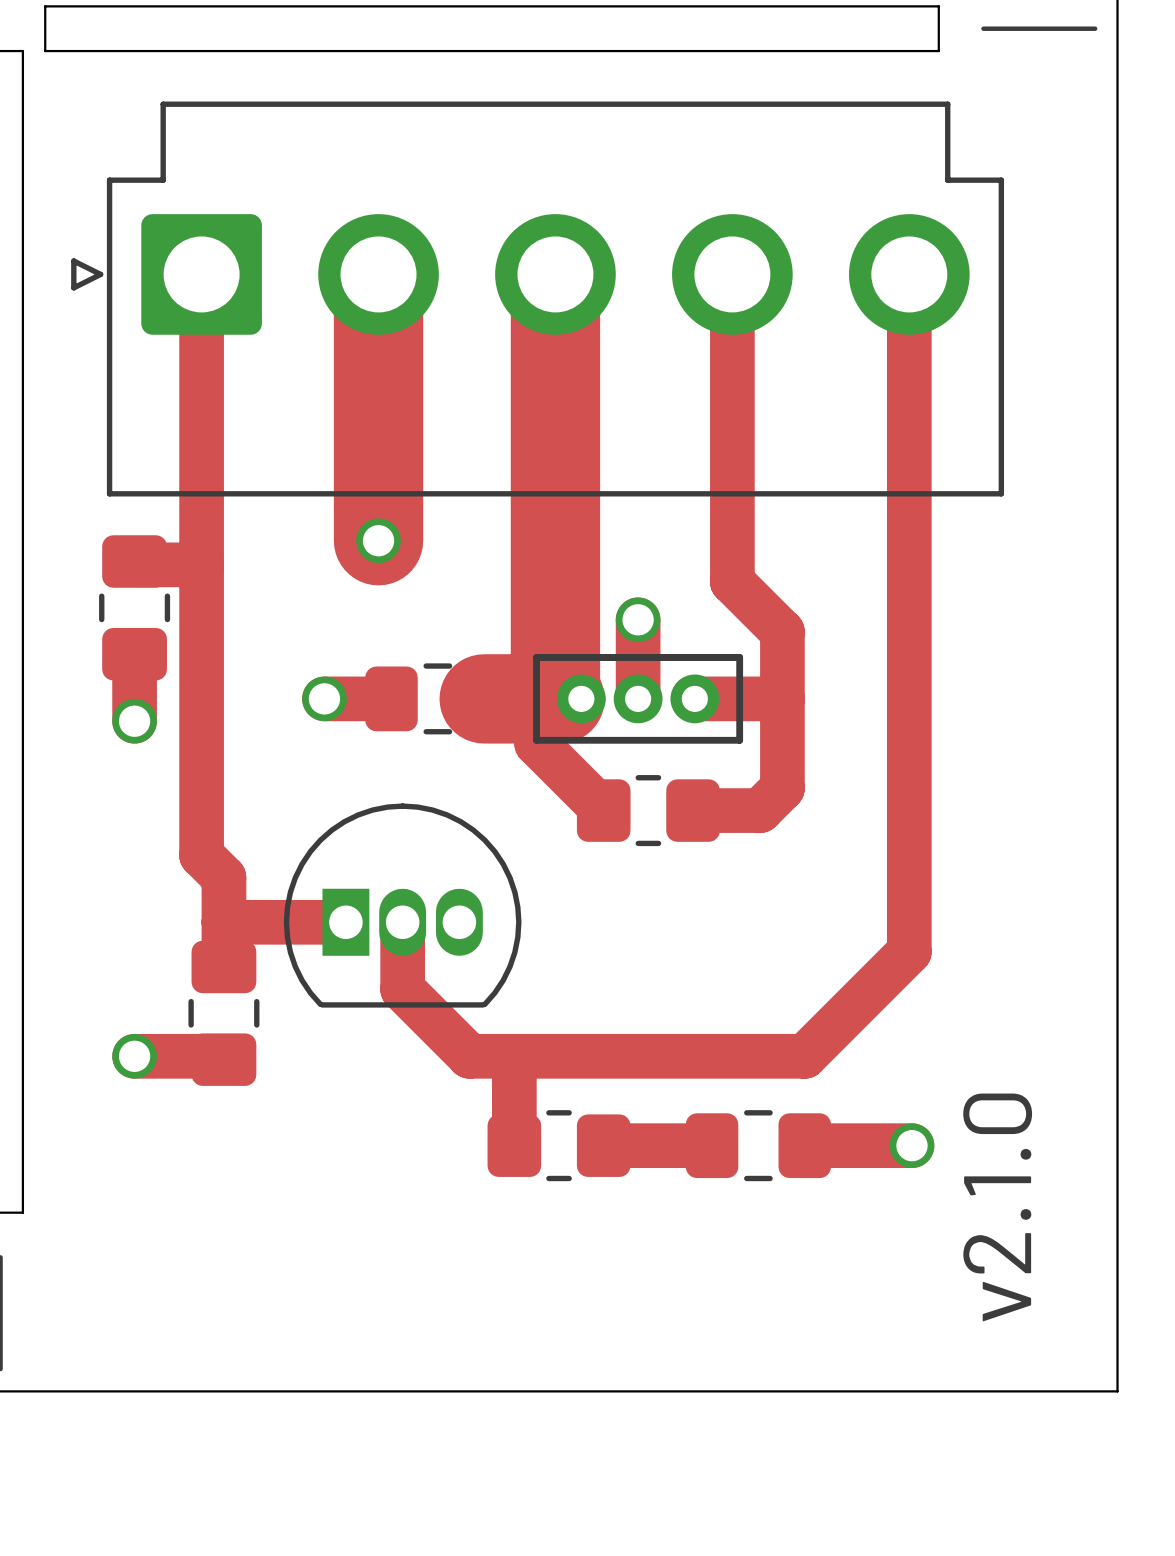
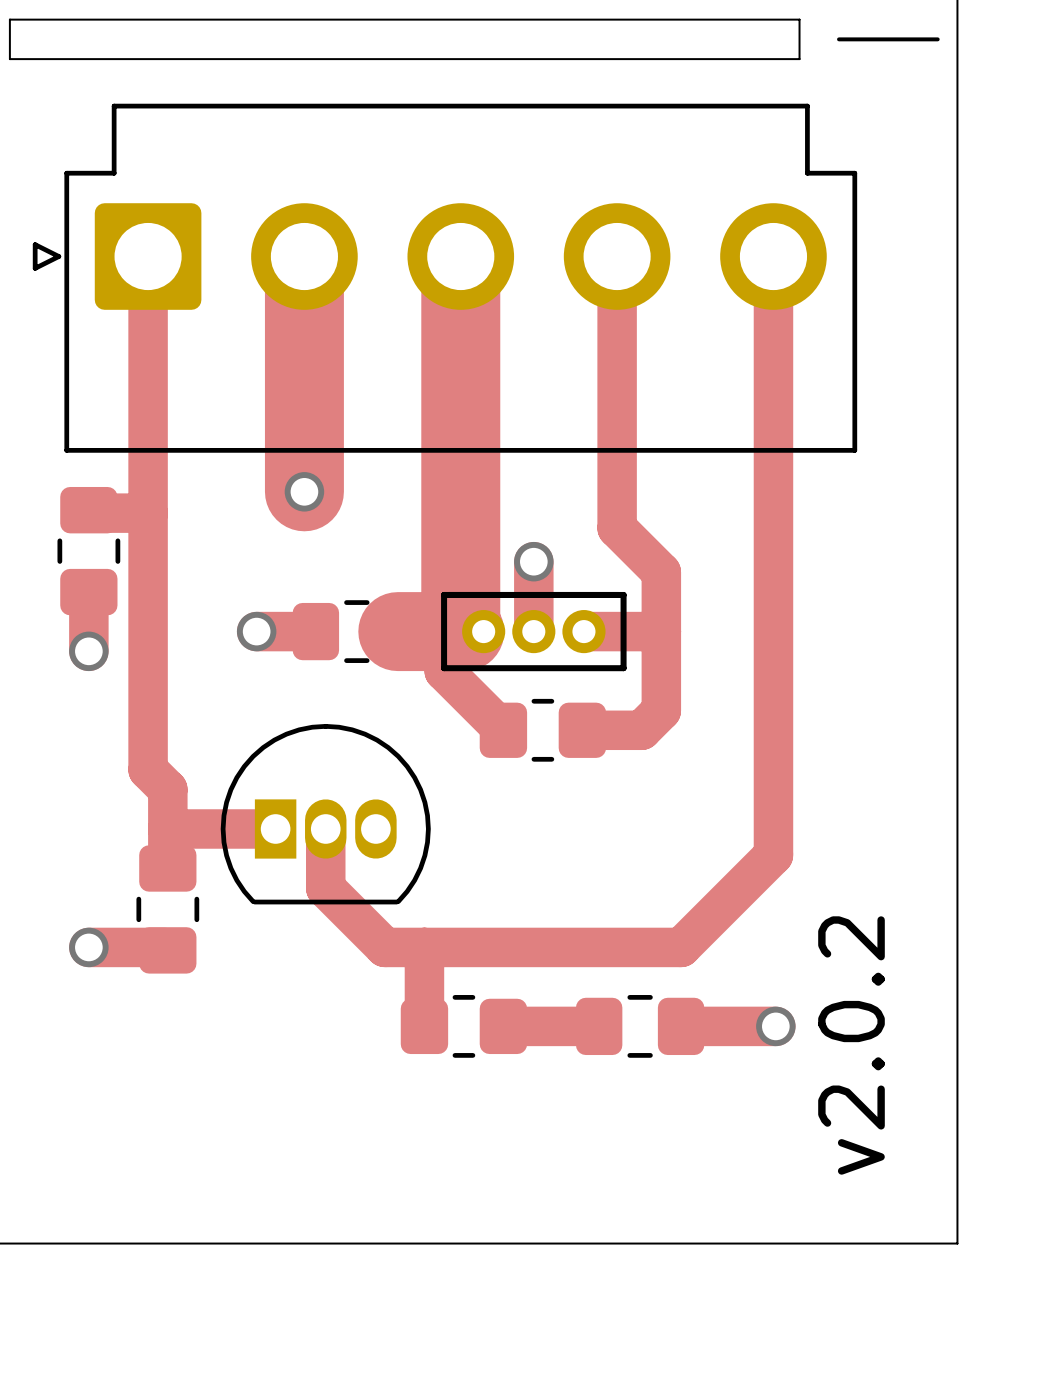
text: v2.1.0 (997, 1207) -> v2.0.2 (851, 1045)

